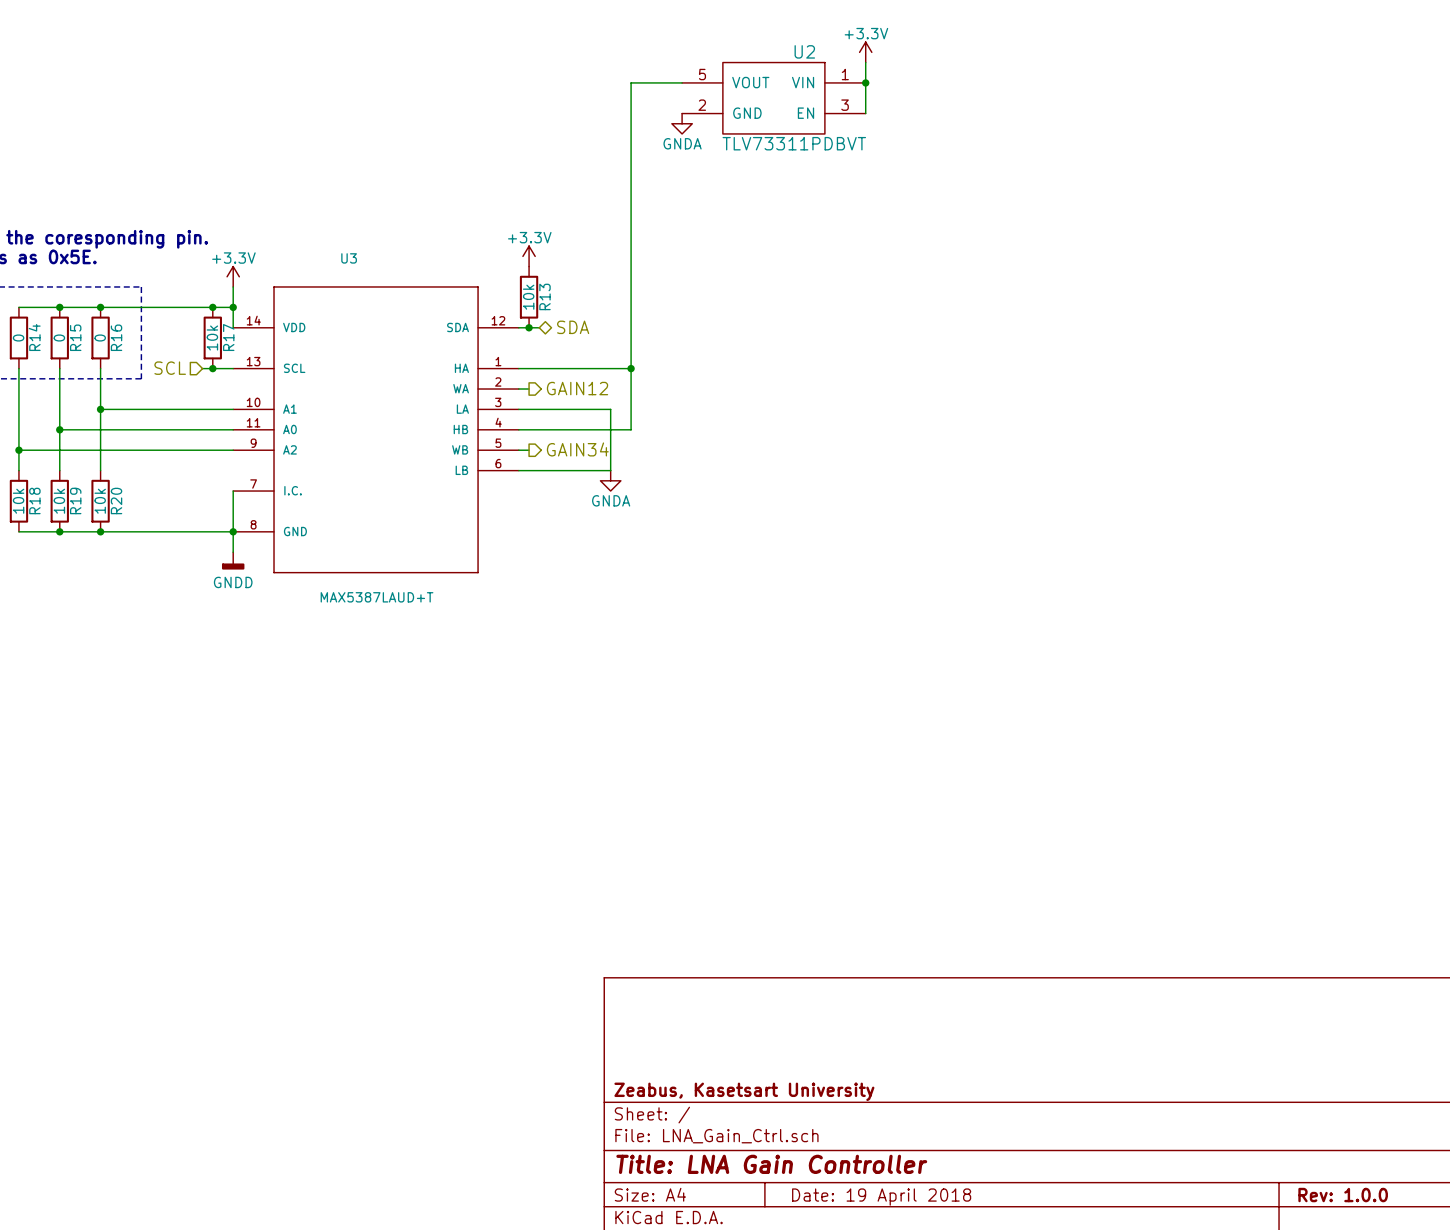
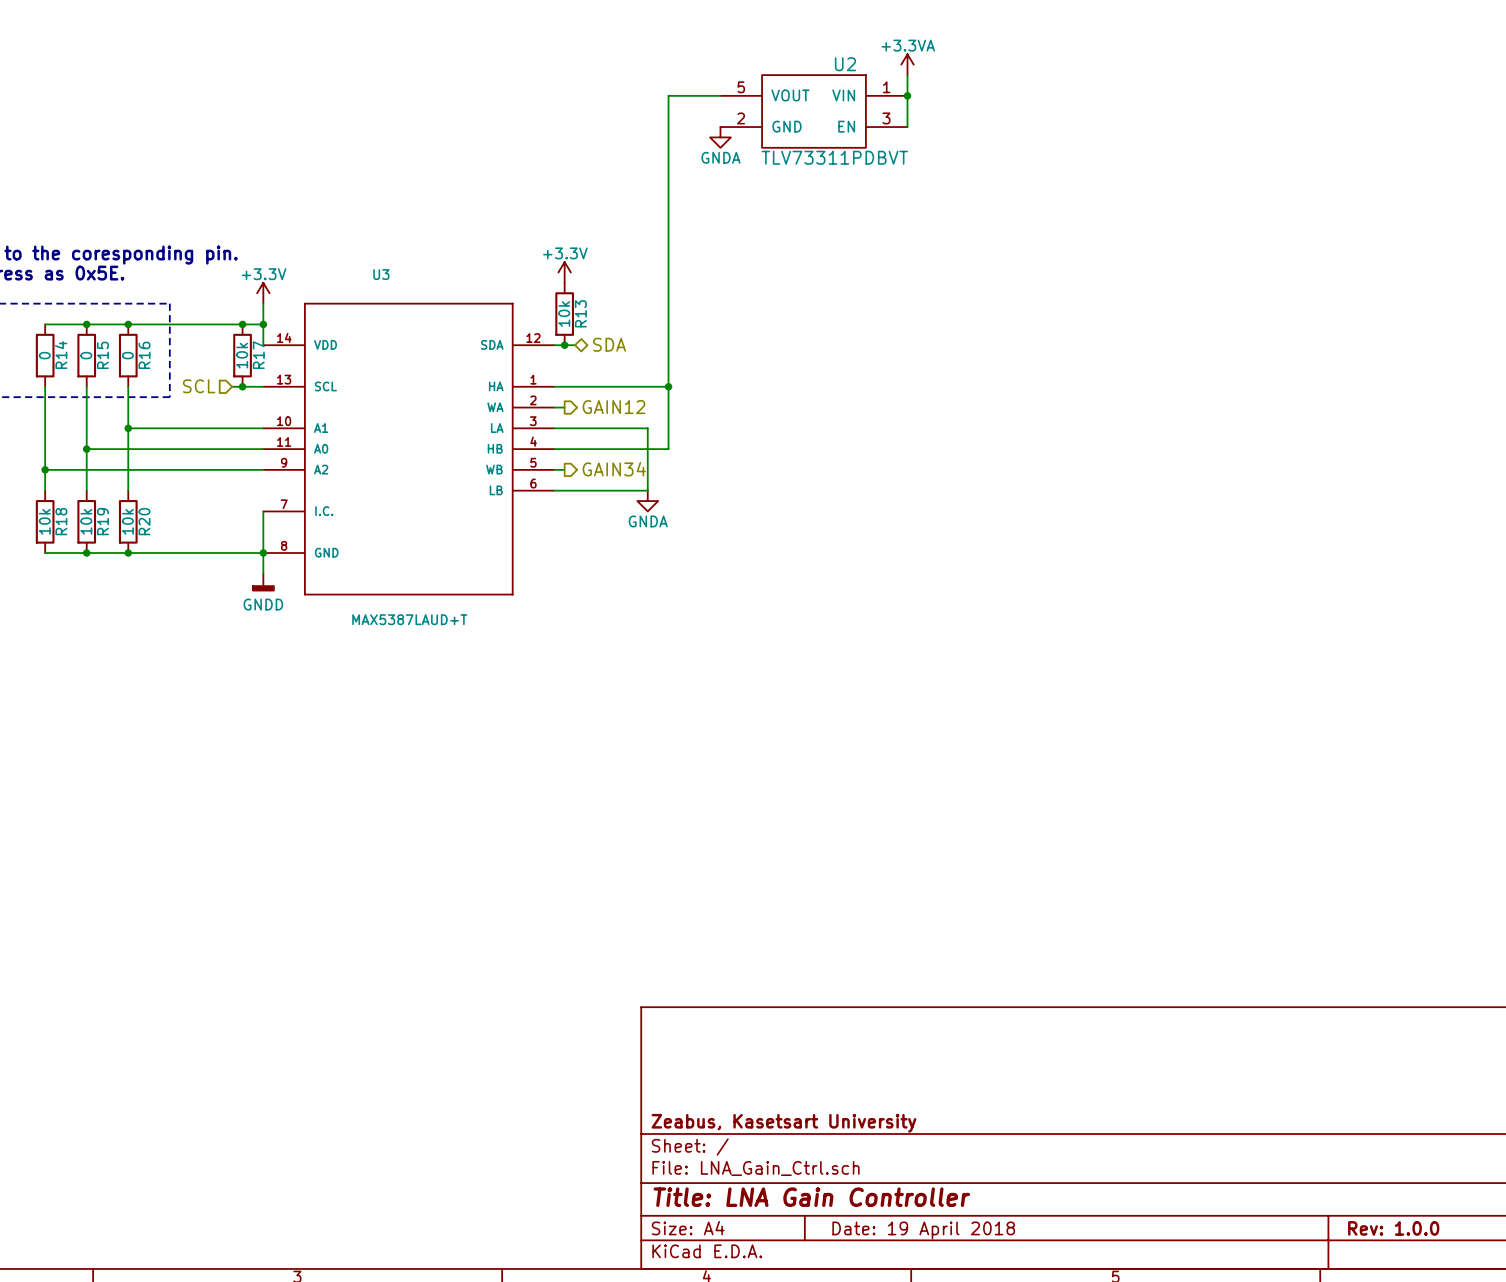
power symbol: +3.3V (865, 52) -> +3.3VA (907, 64)

